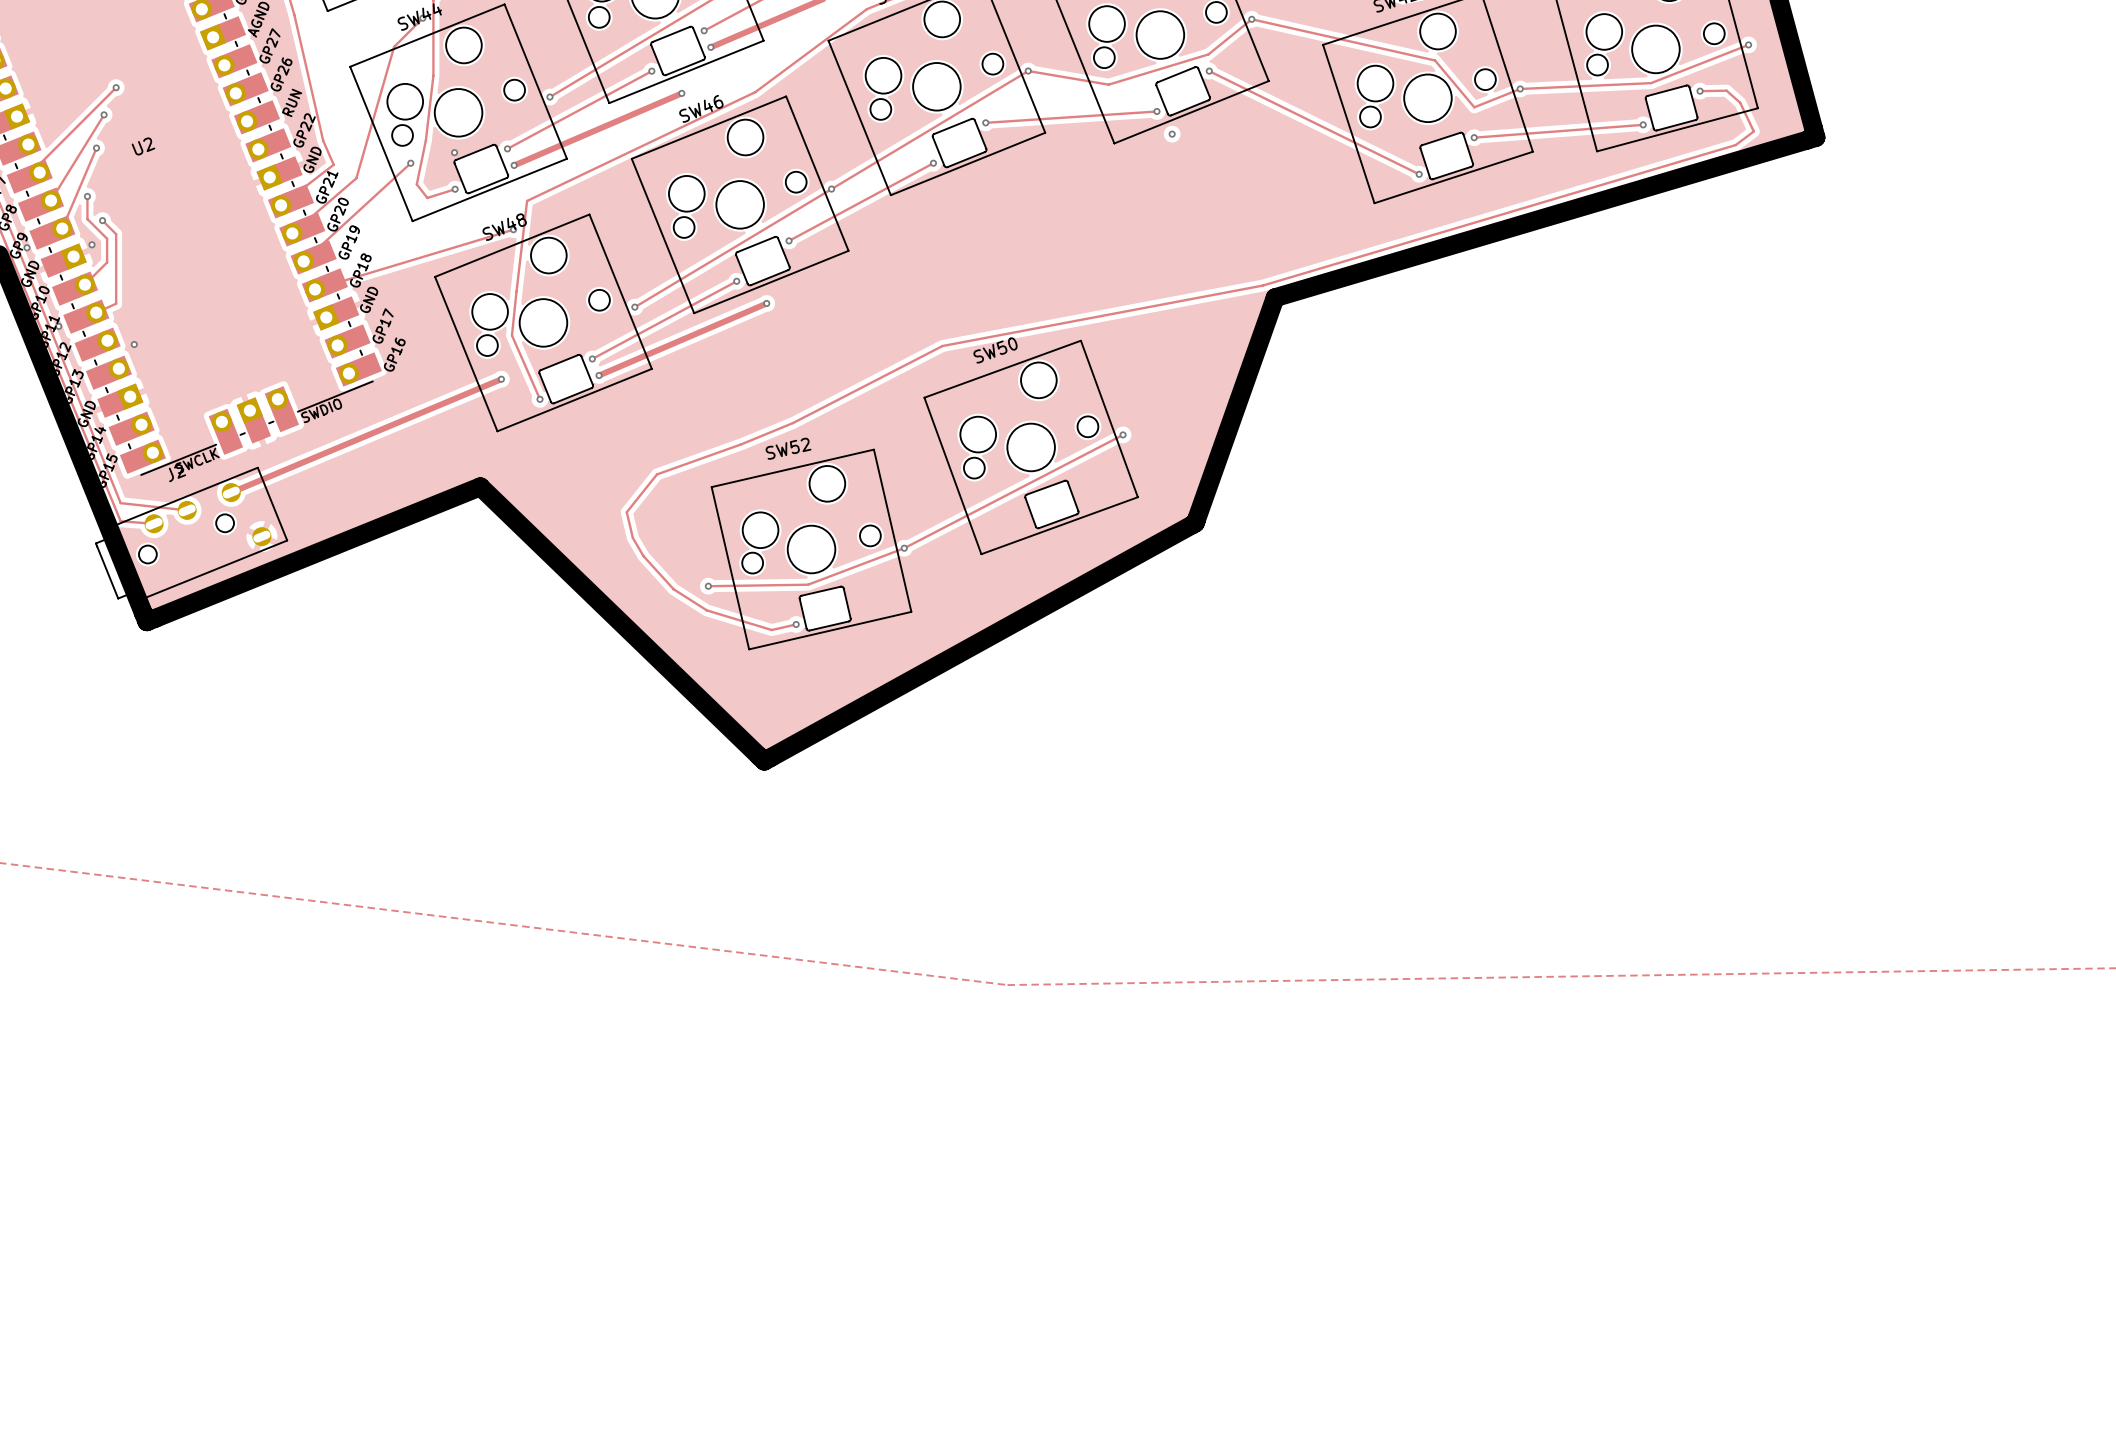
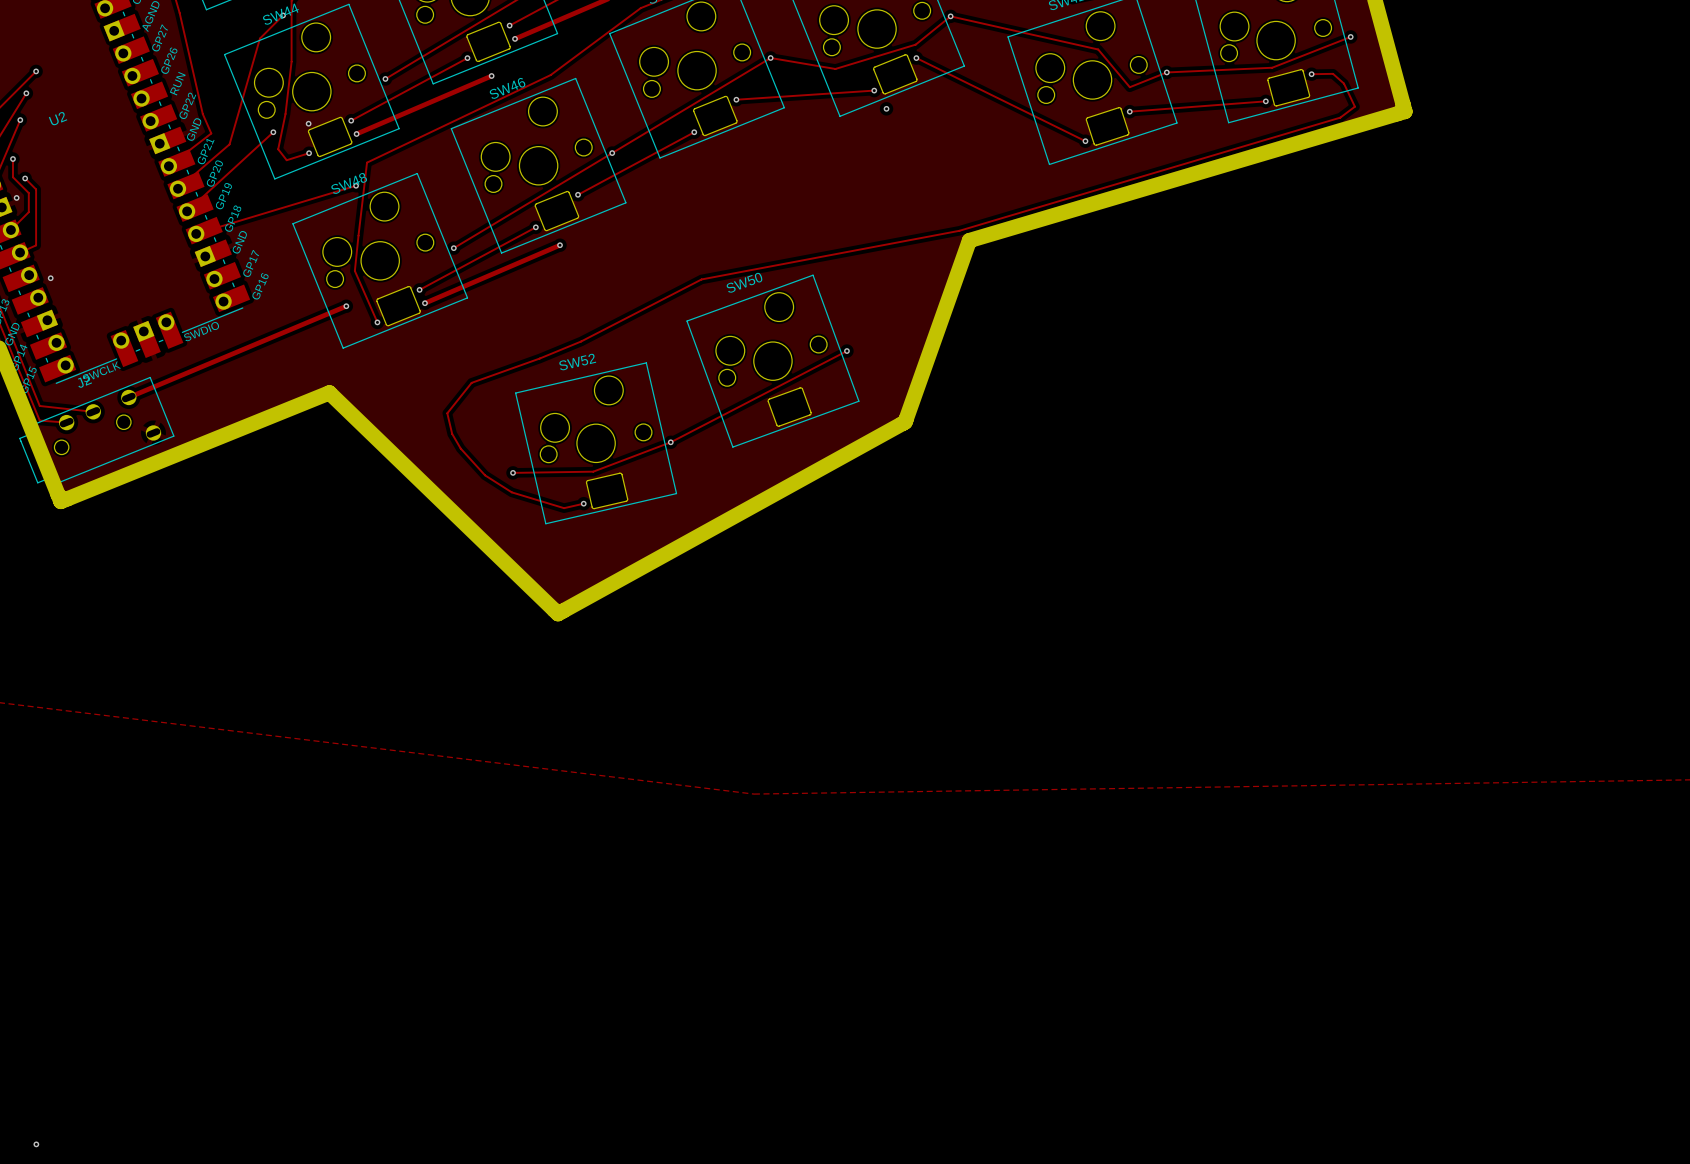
via: none -> (36, 1144)

